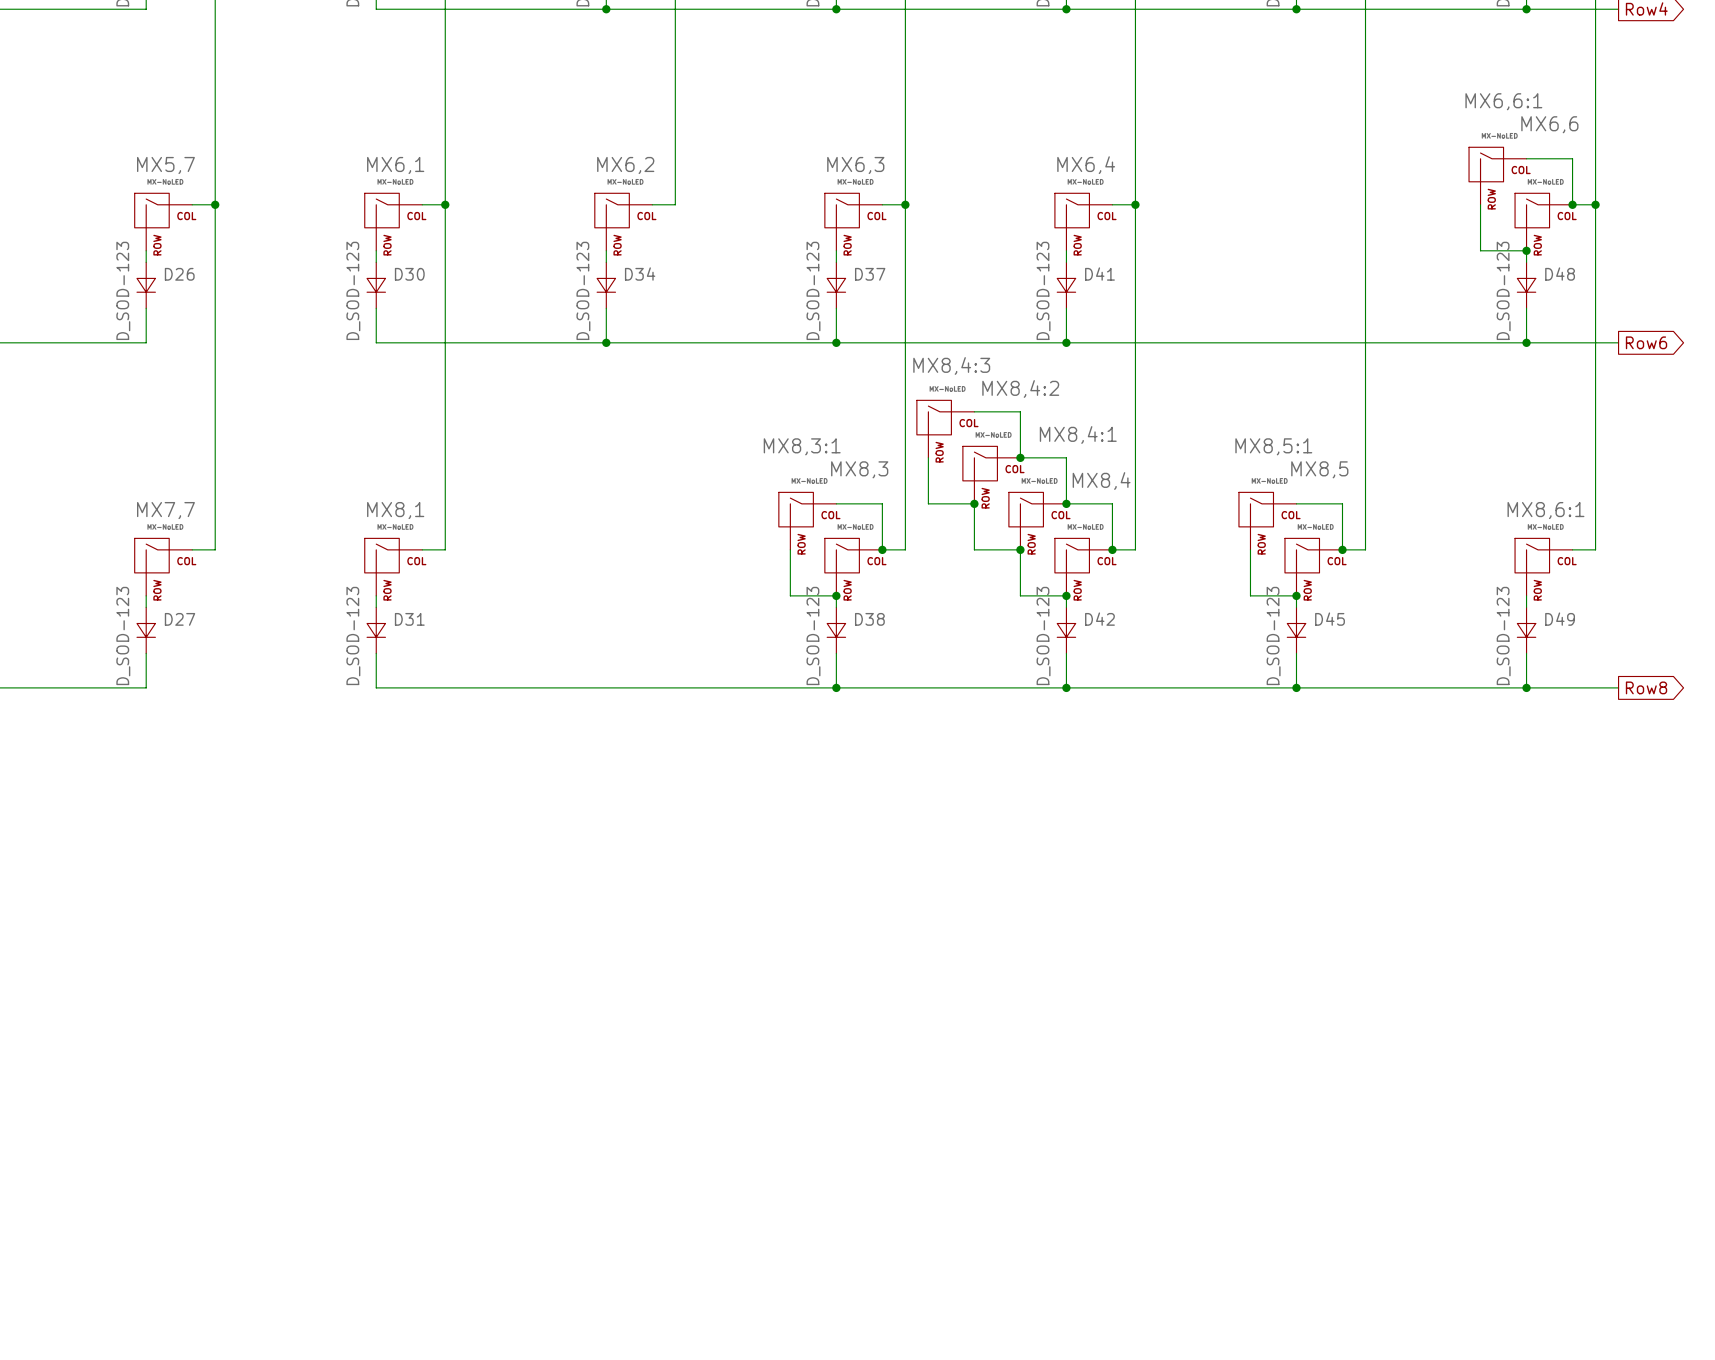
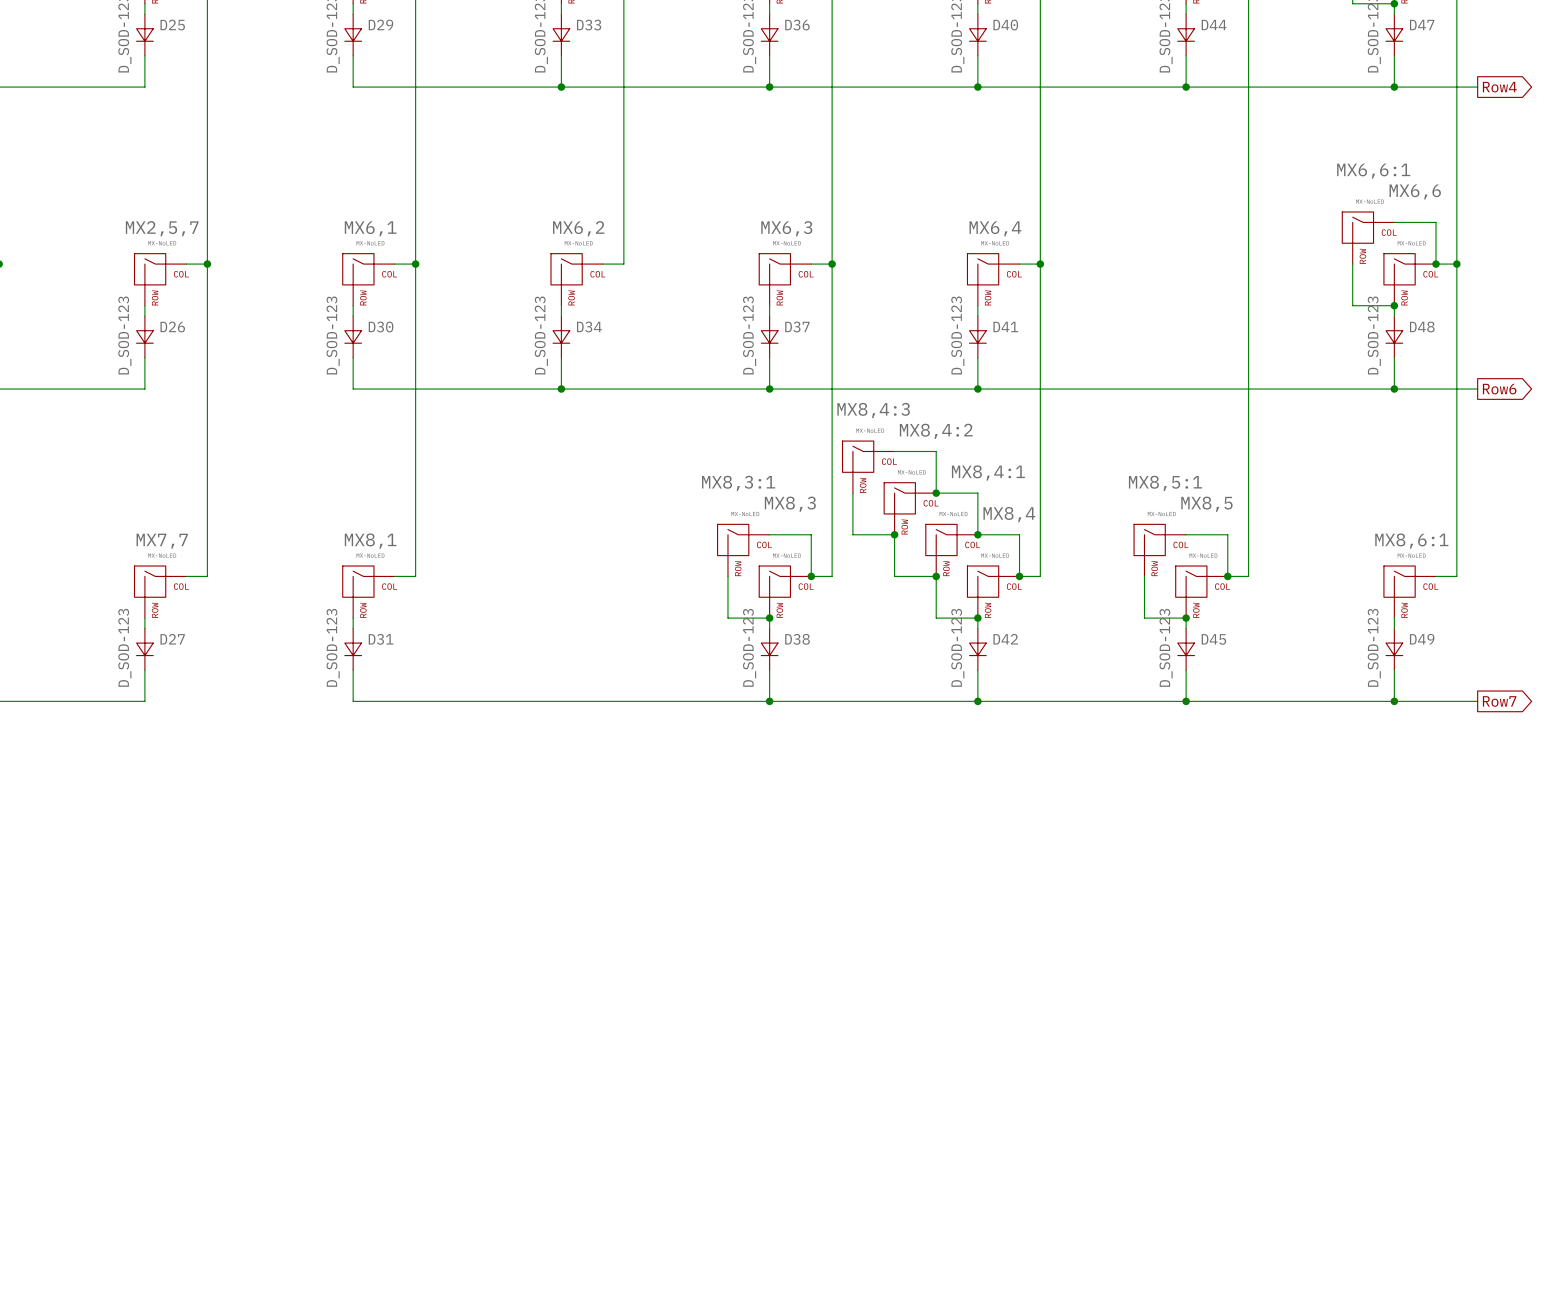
MX5,7 name: MX5,7 (165, 165) -> MX2,5,7 (162, 228)
global label: Row8 (1646, 687) -> Row7 (1499, 701)

